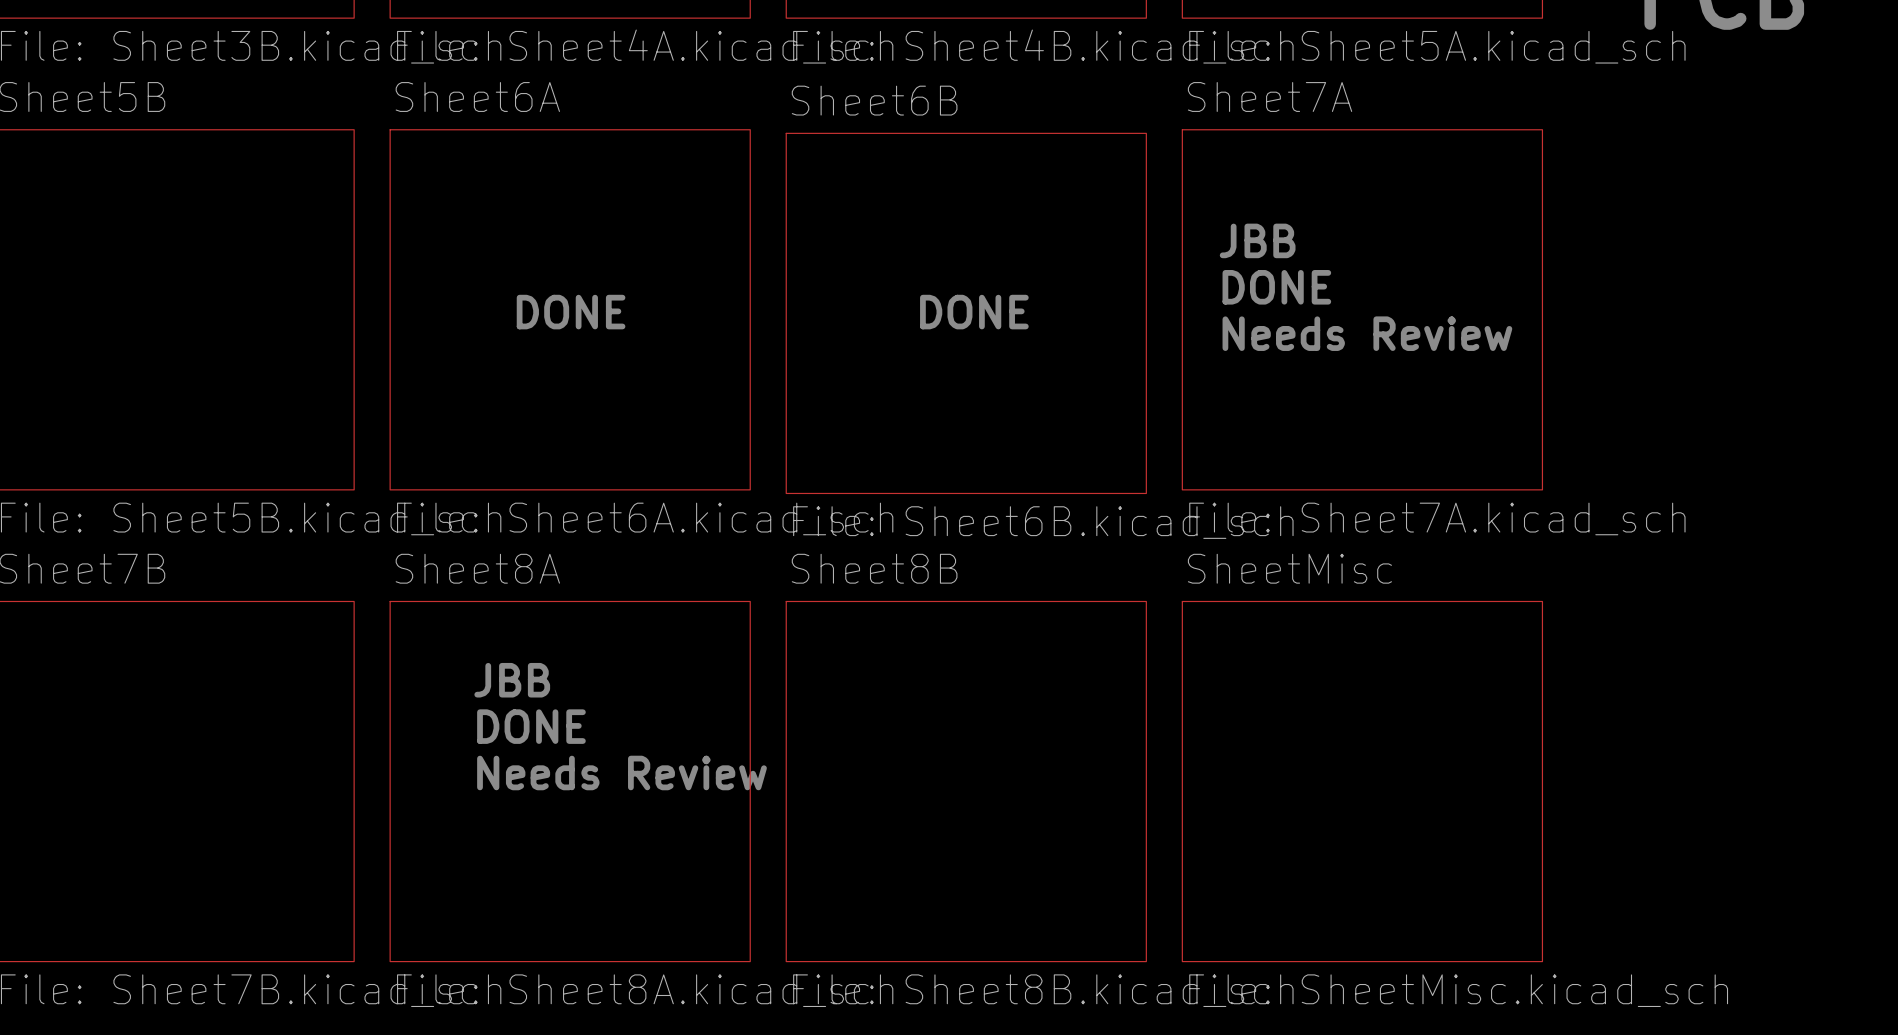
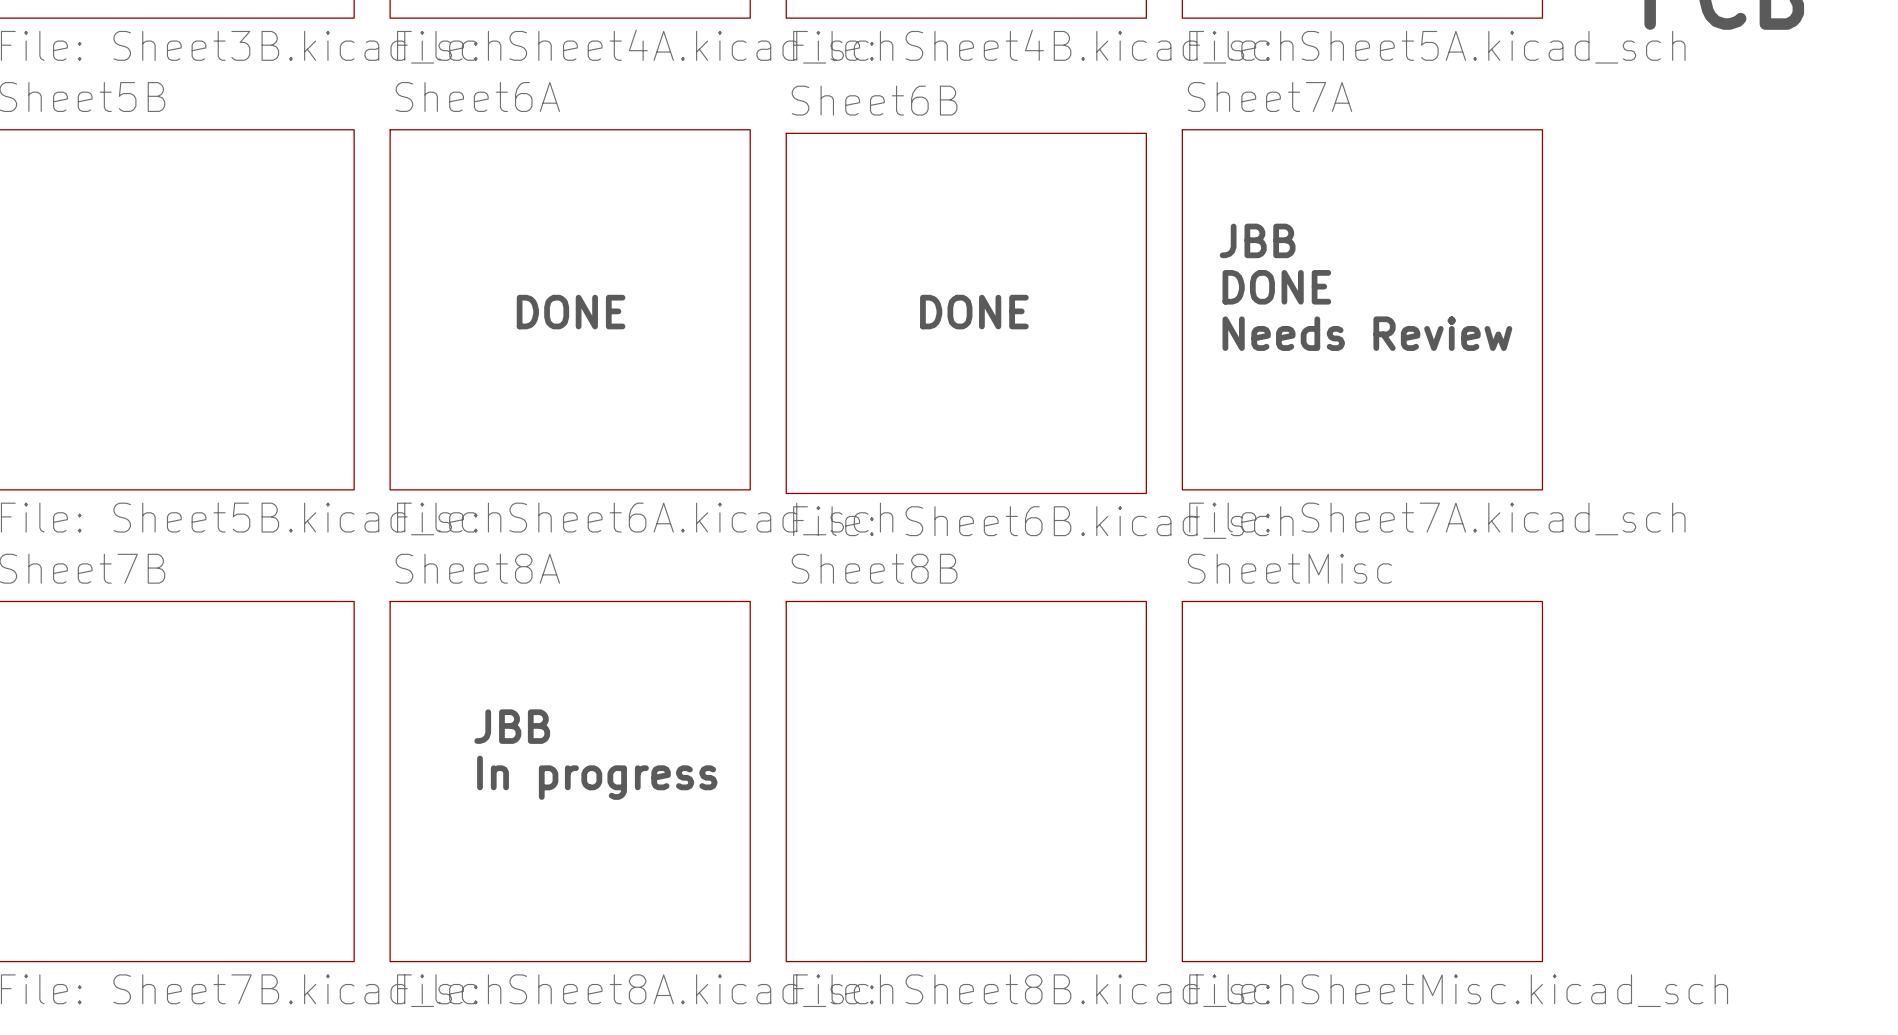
text: JBB (512, 680) -> none
text: DONE (531, 726) -> JBB (512, 726)
text: Needs Review (621, 772) -> In progress (597, 777)

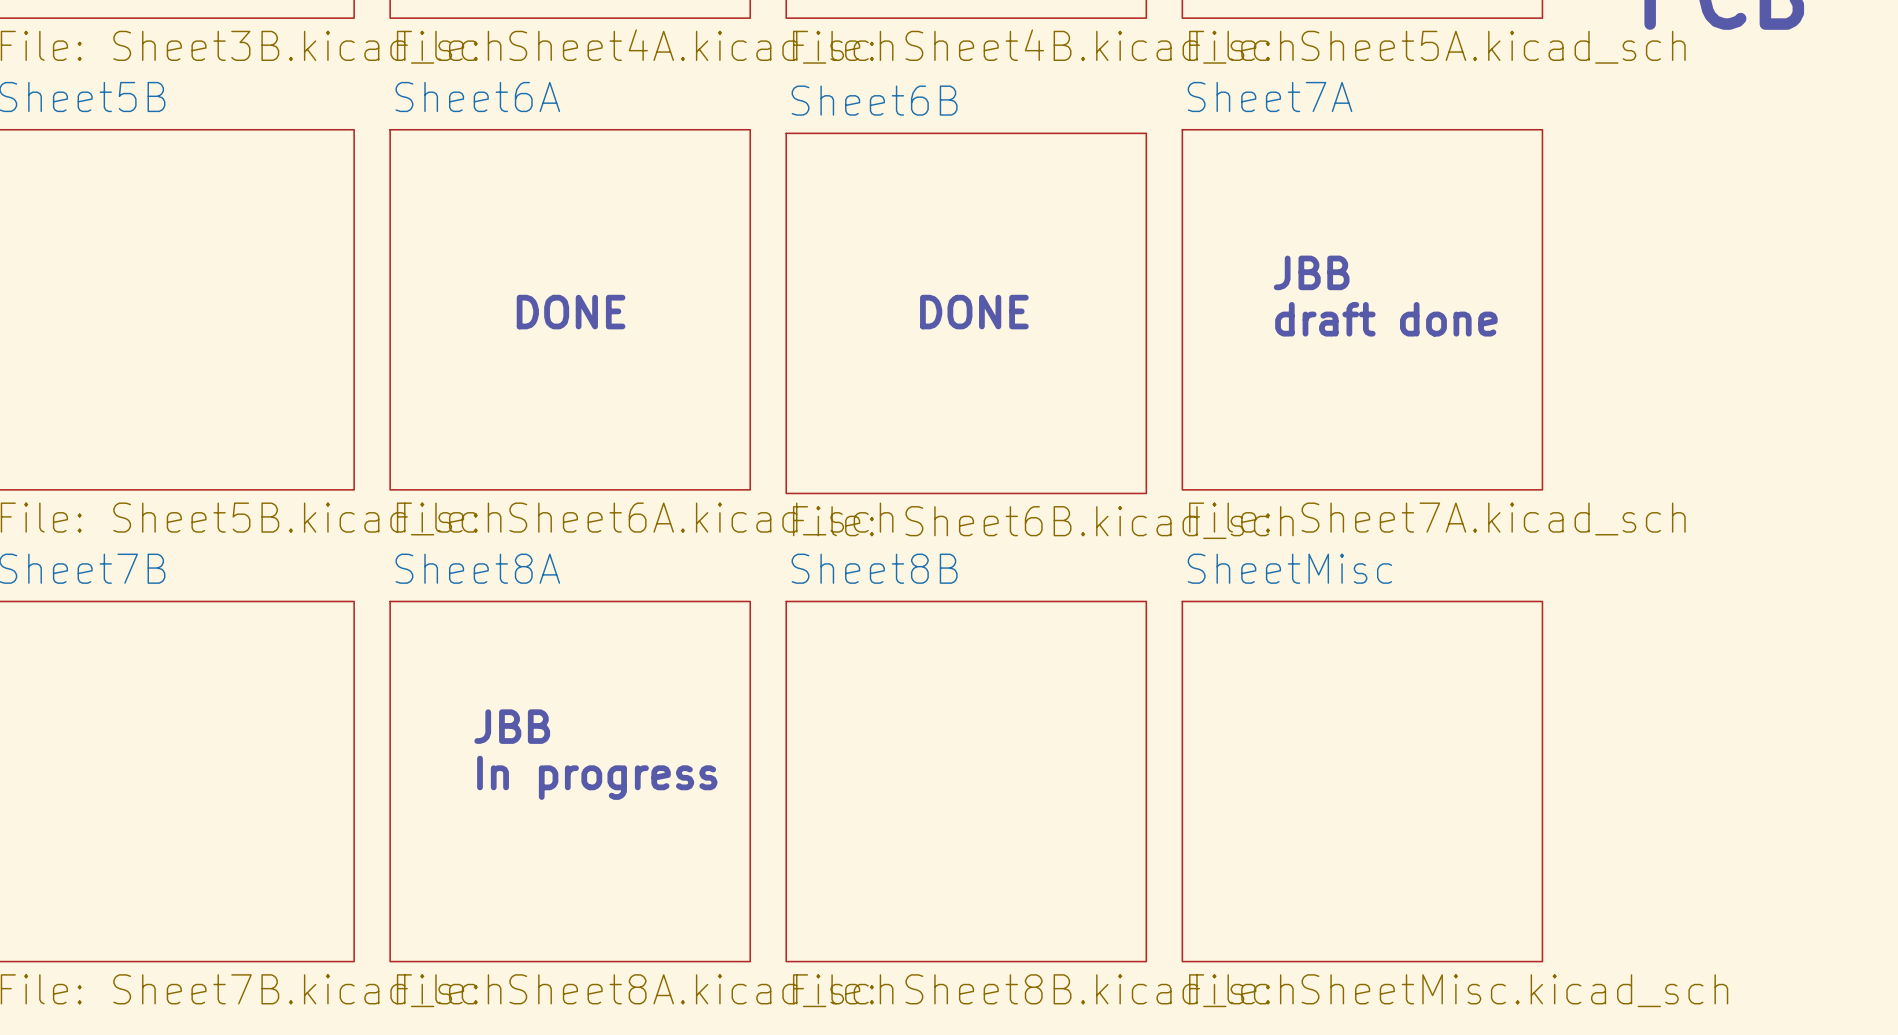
text position: JBB (1257, 240) -> JBB (1311, 272)
text: DONE (1276, 287) -> none
text: none -> draft done (1386, 319)
text: Needs Review (1367, 333) -> none

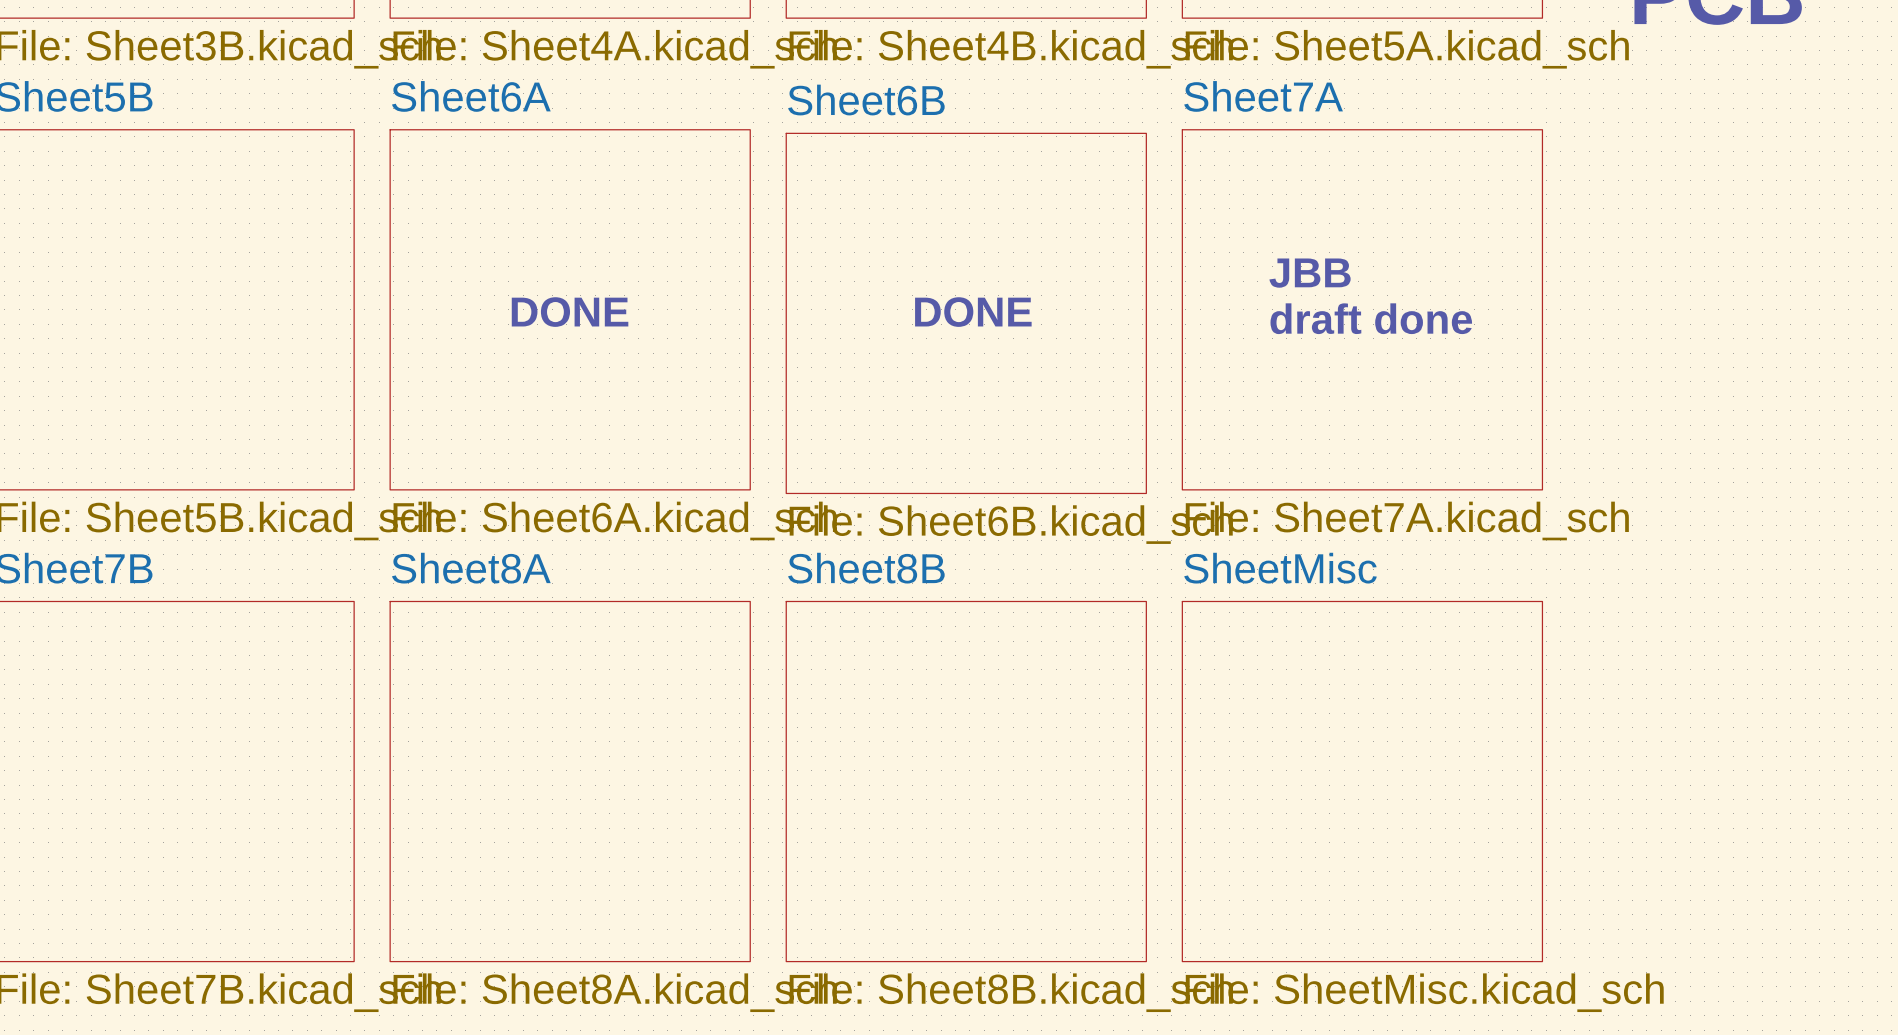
text: JBB (512, 726) -> none
text: In progress (597, 777) -> none

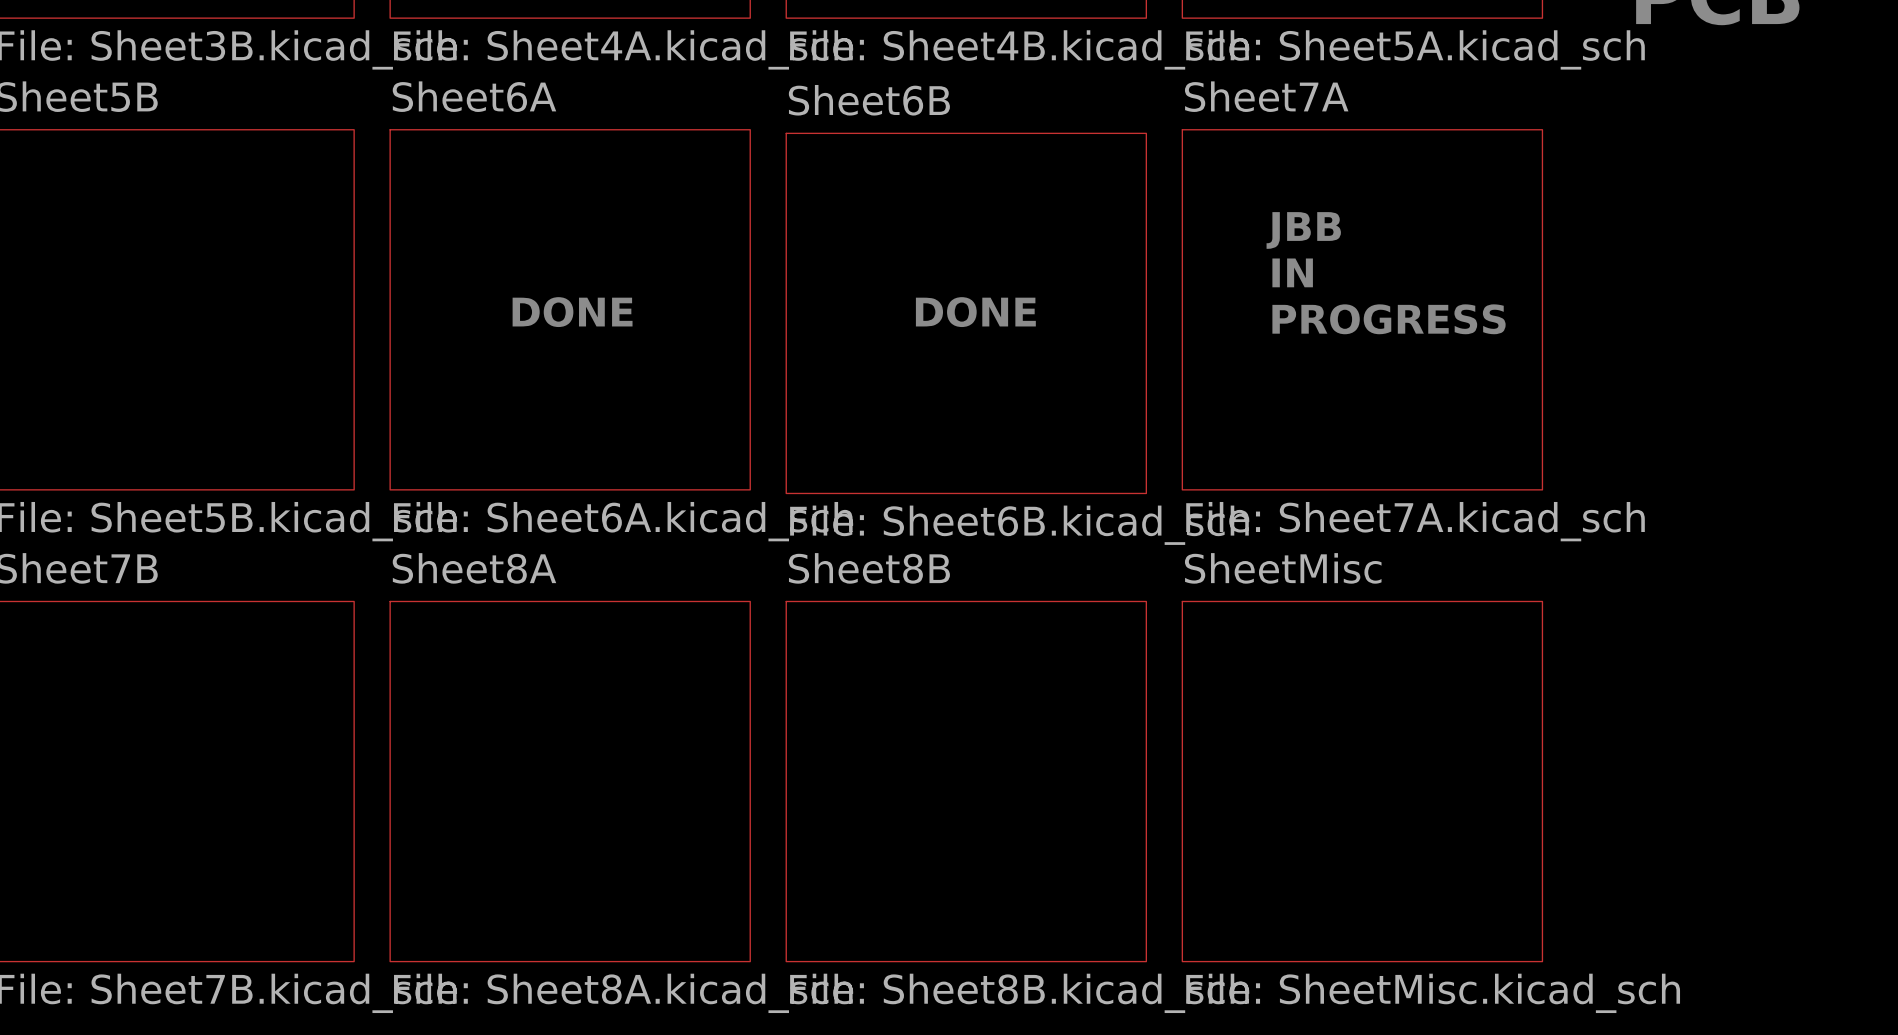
text: none -> JBB (1303, 230)
text: JBB (1310, 273) -> IN (1292, 272)
text: draft done (1371, 318) -> PROGRESS (1389, 319)

